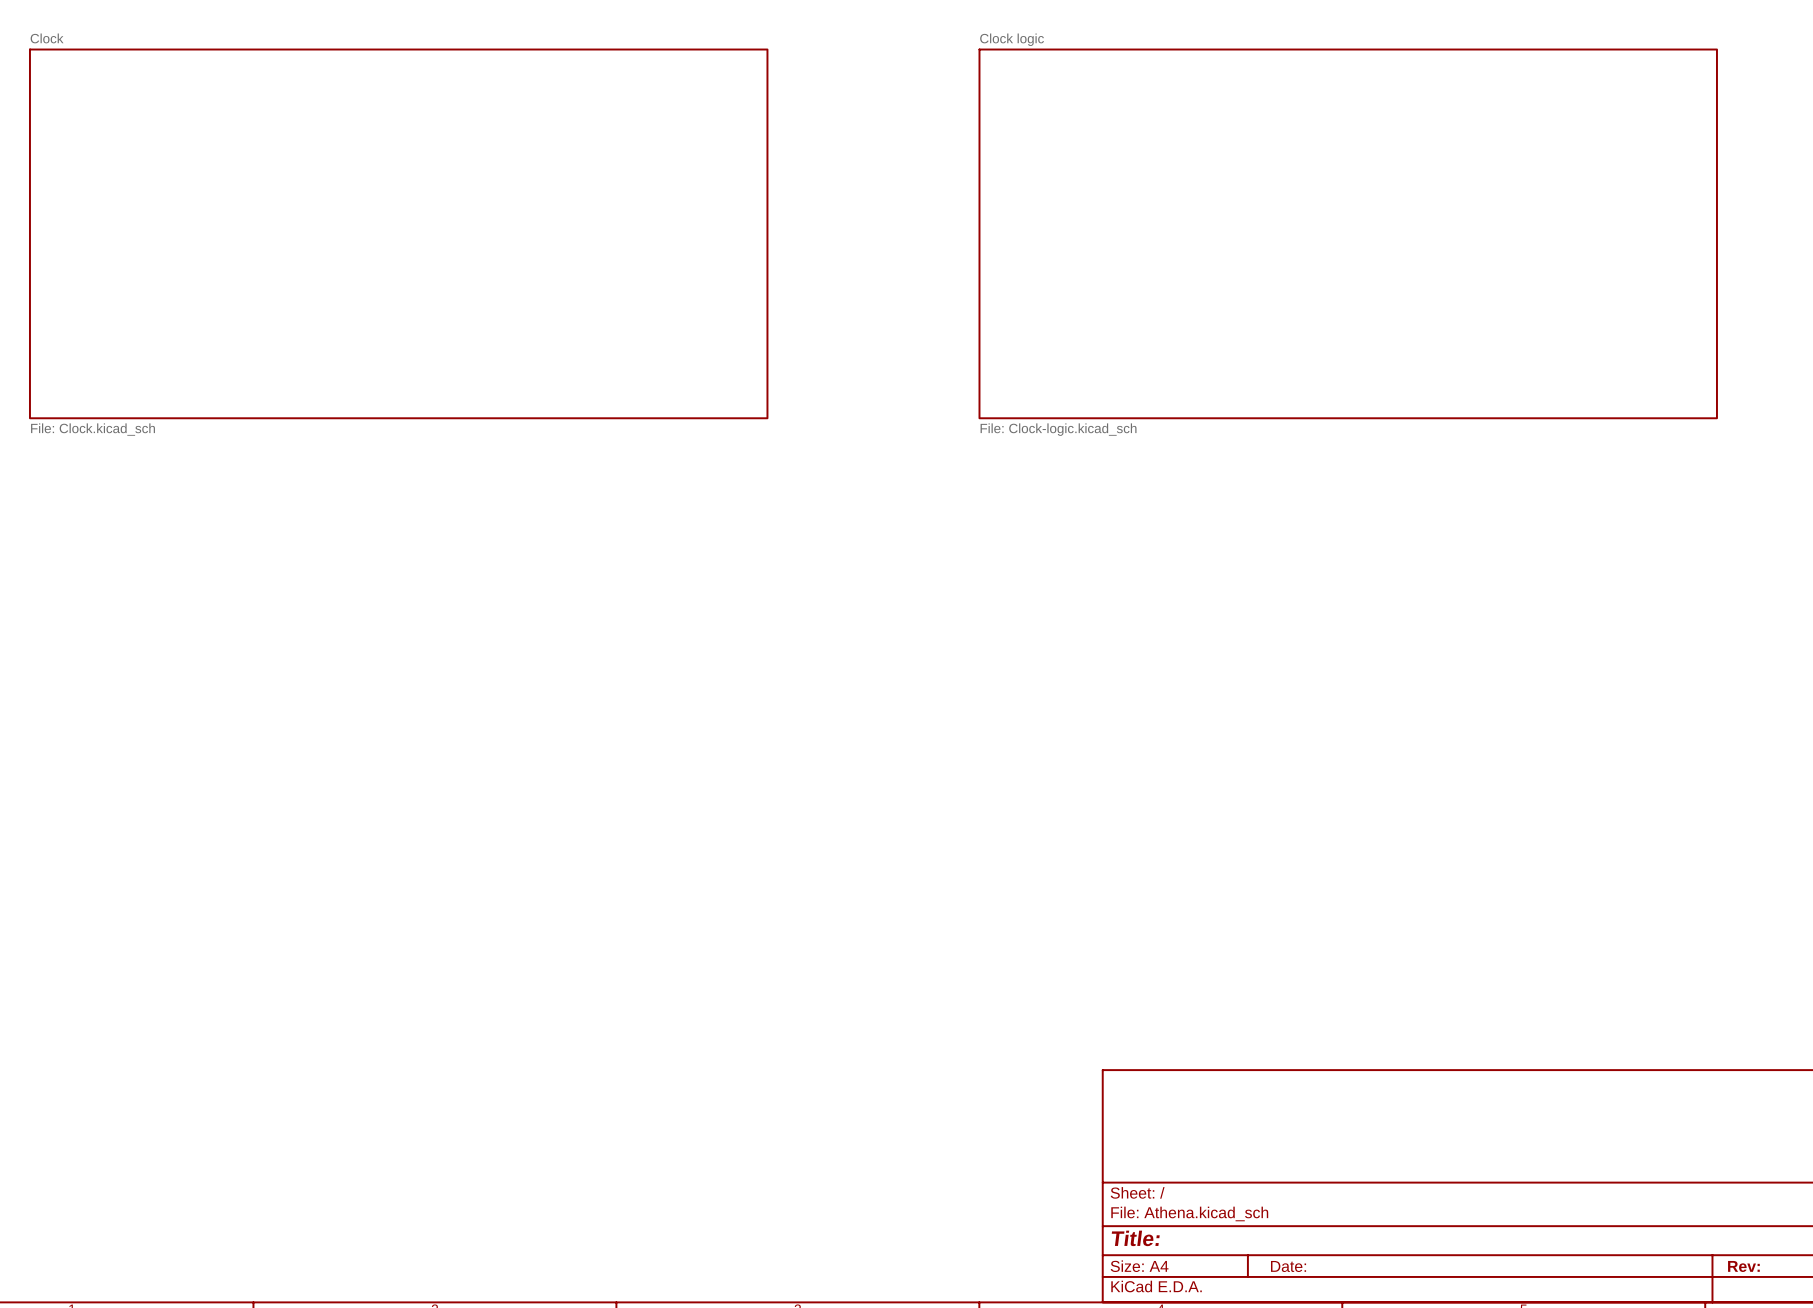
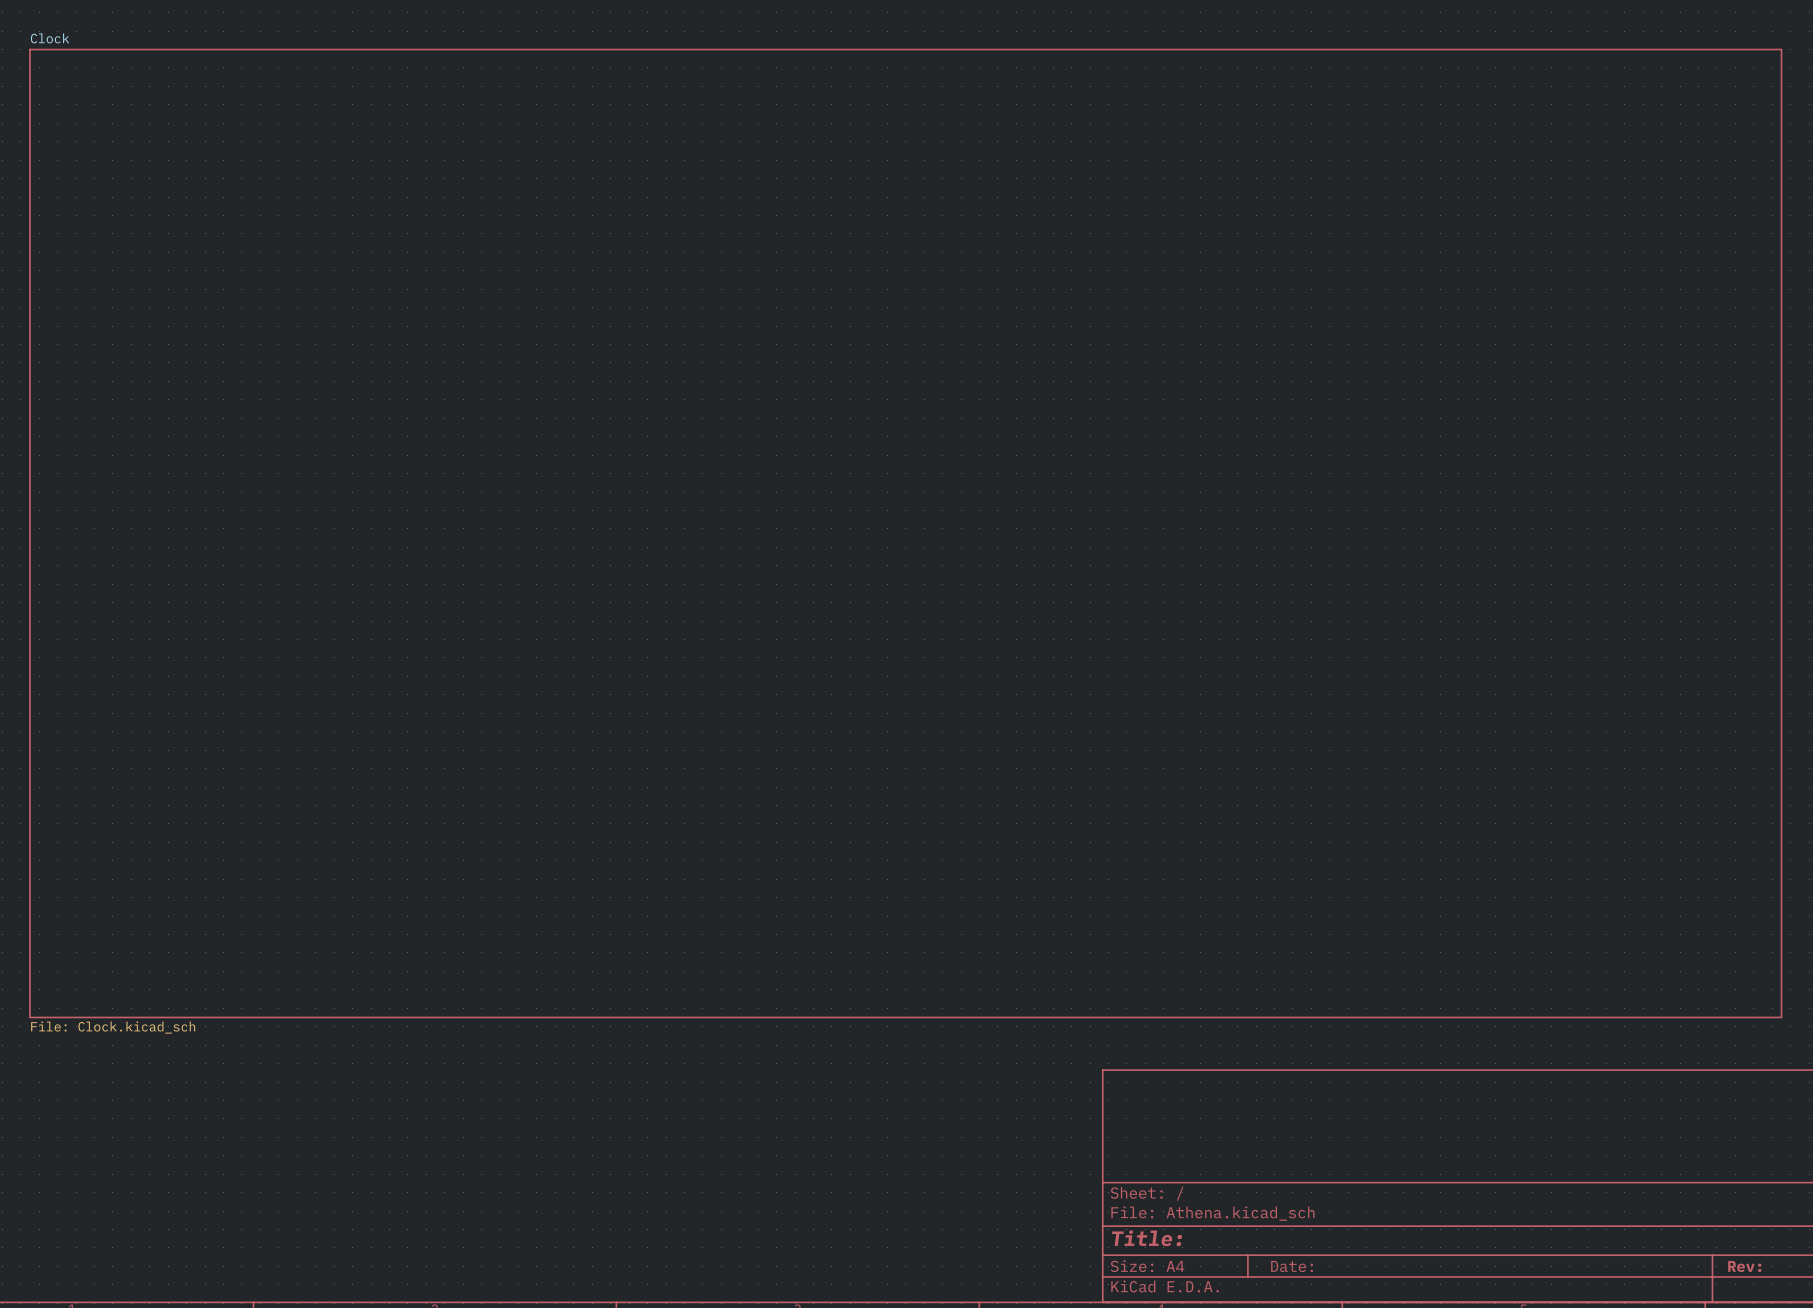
sheet Clock: File: Clock.kicad_sch (398, 233) -> none
sheet Clock logic: File: Clock-logic.kicad_sch (1348, 233) -> none
sheet Clock: none -> File: Clock.kicad_sch (905, 533)

